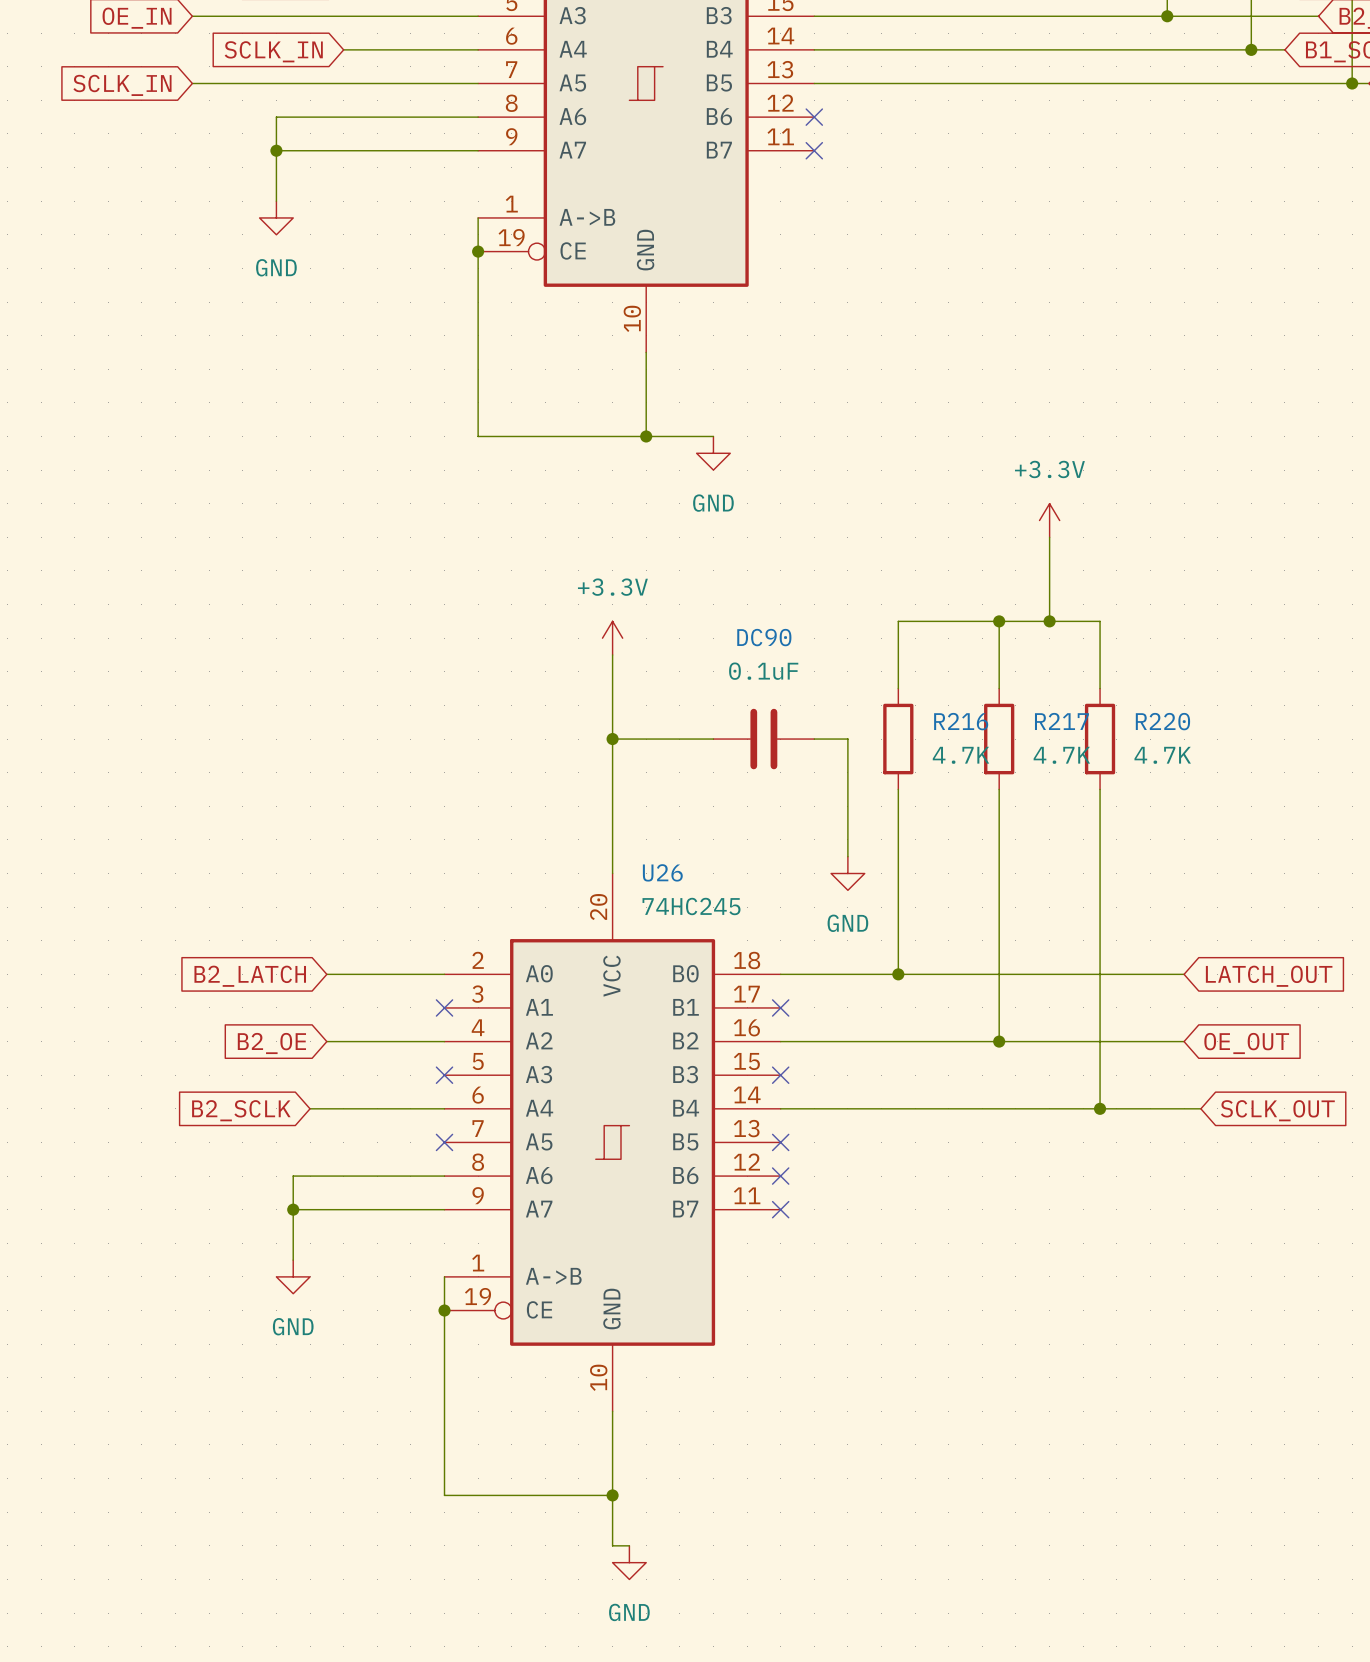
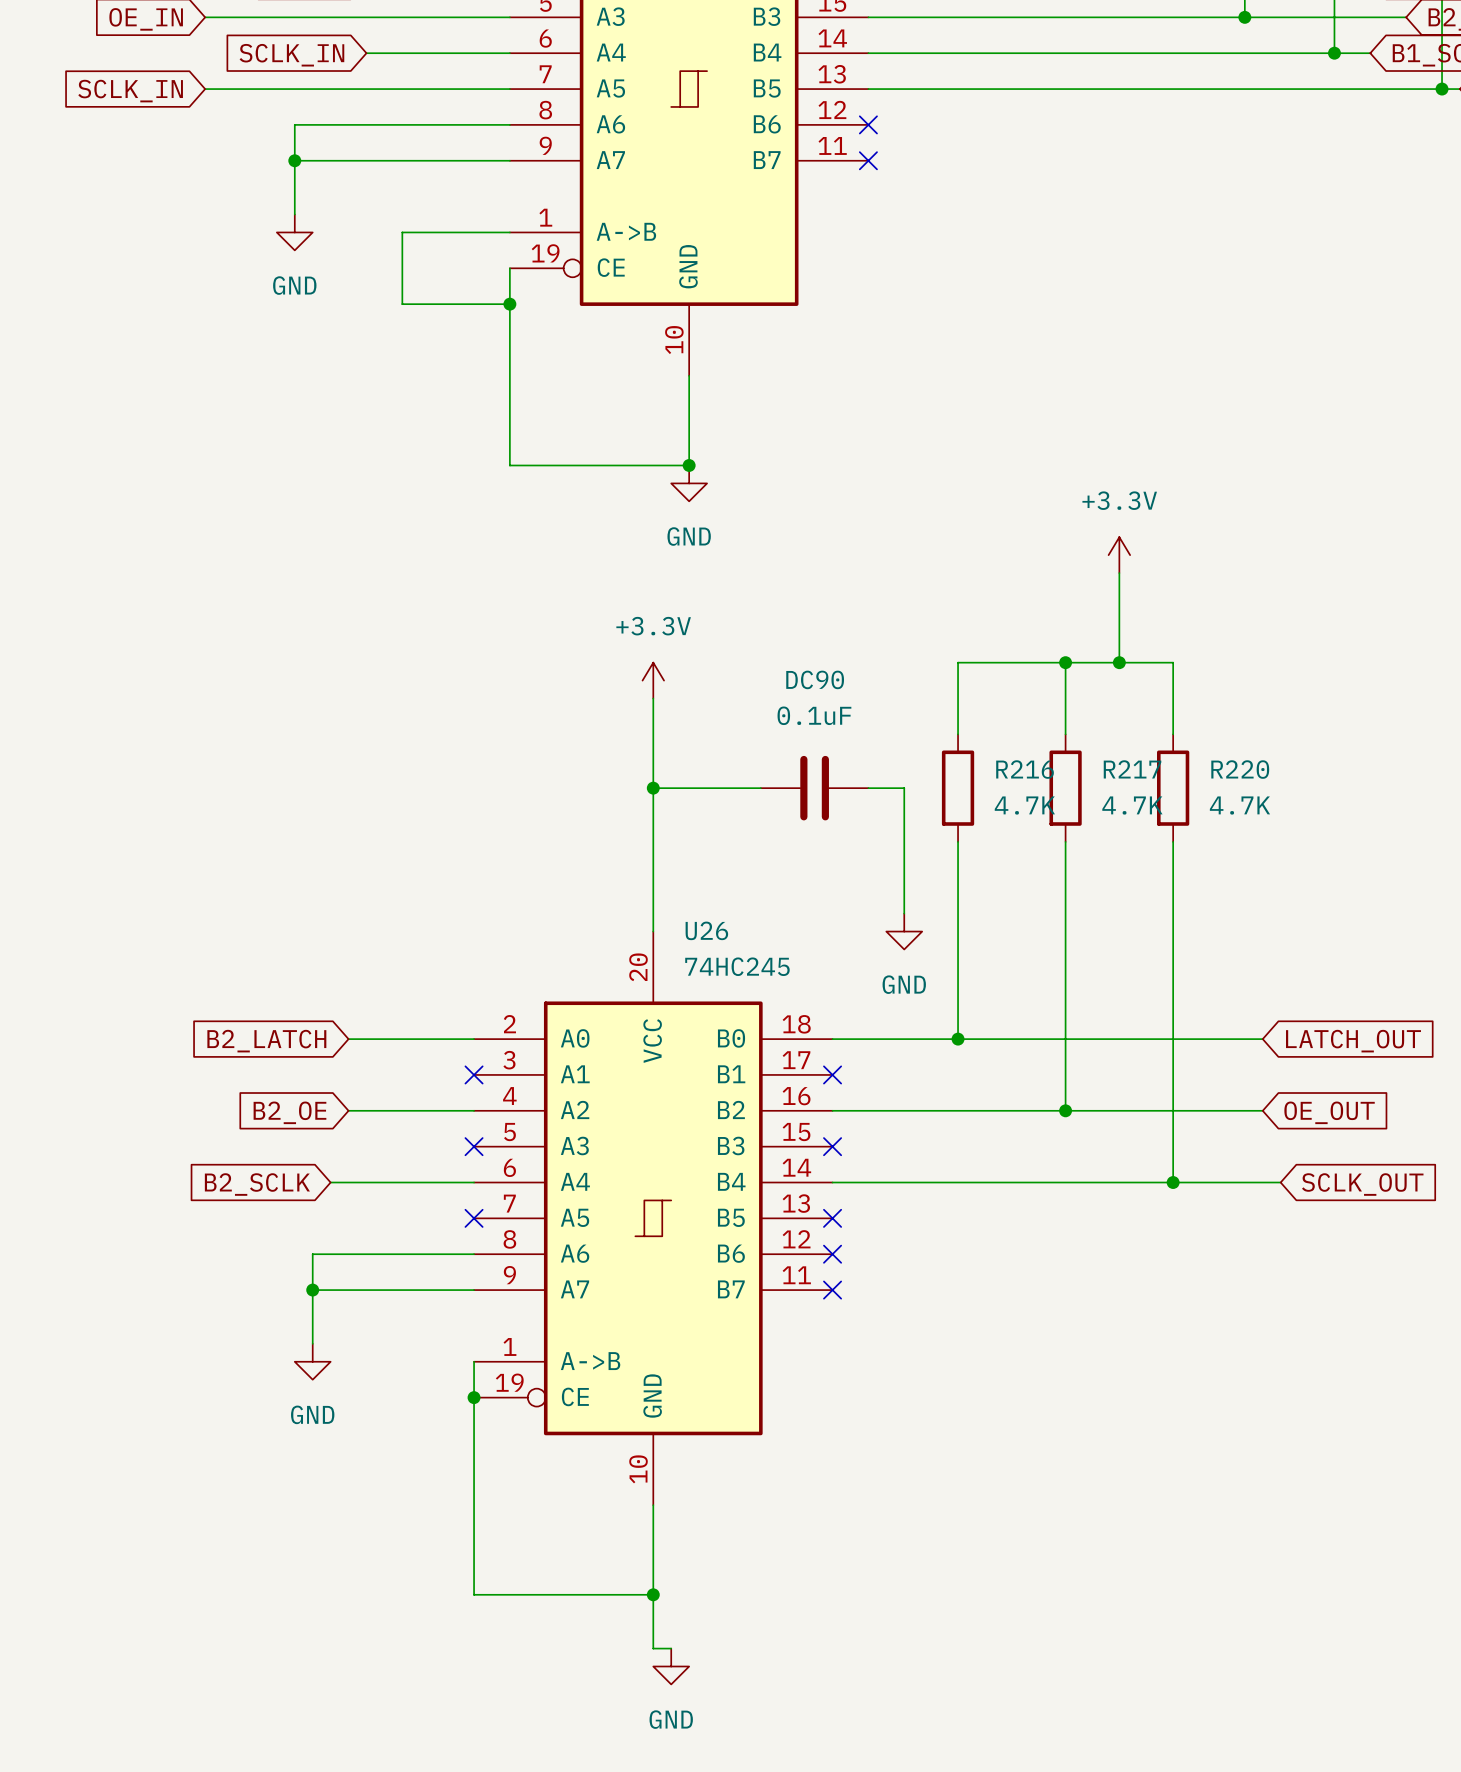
wire: (478, 217) (478, 251) -> (509, 232) (402, 232) (402, 304) (509, 304)
junction position: (478, 251) -> (509, 304)
wire: (646, 436) (713, 436) -> none
power symbol position: GND (713, 453) -> GND (689, 483)

